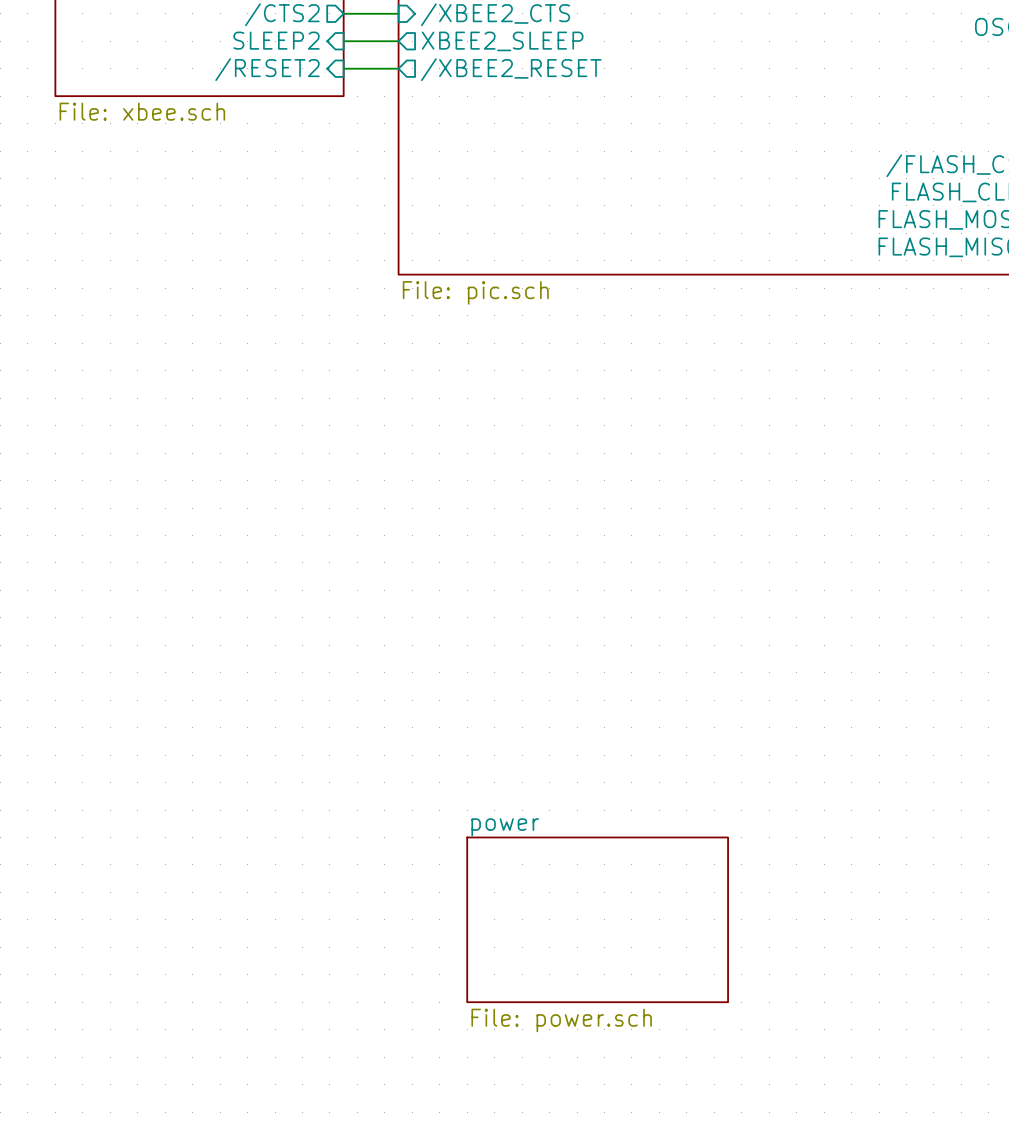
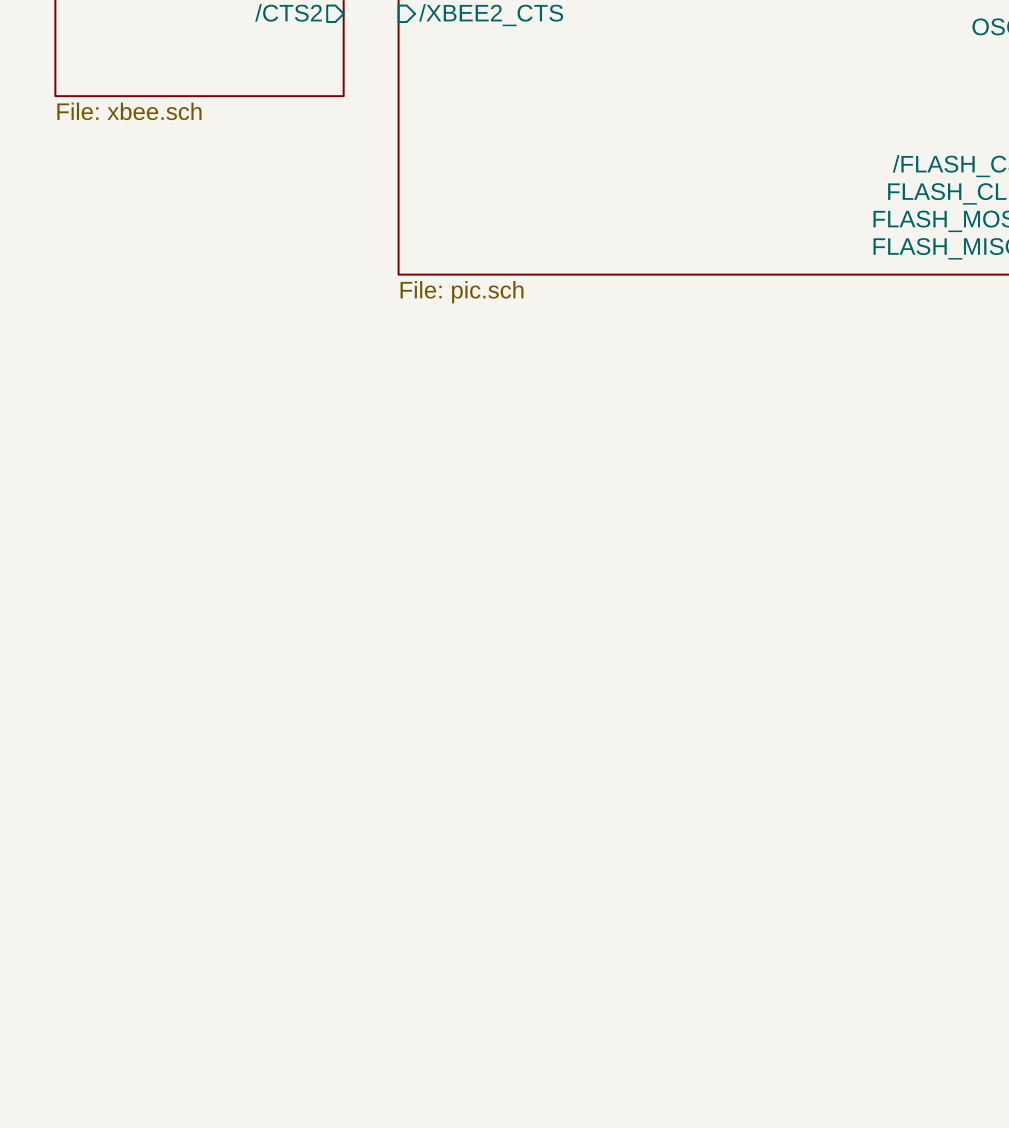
wire: (343, 13) (398, 13) -> none
sheet pin: SLEEP2 (276, 40) -> none
wire: (343, 41) (398, 41) -> none
sheet pin: XBEE2_SLEEP (502, 41) -> none
wire: (343, 68) (398, 68) -> none
sheet pin: /RESET2 (267, 69) -> none
sheet pin: /XBEE2_RESET (511, 69) -> none
sheet power: File: power.sch (597, 919) -> none

